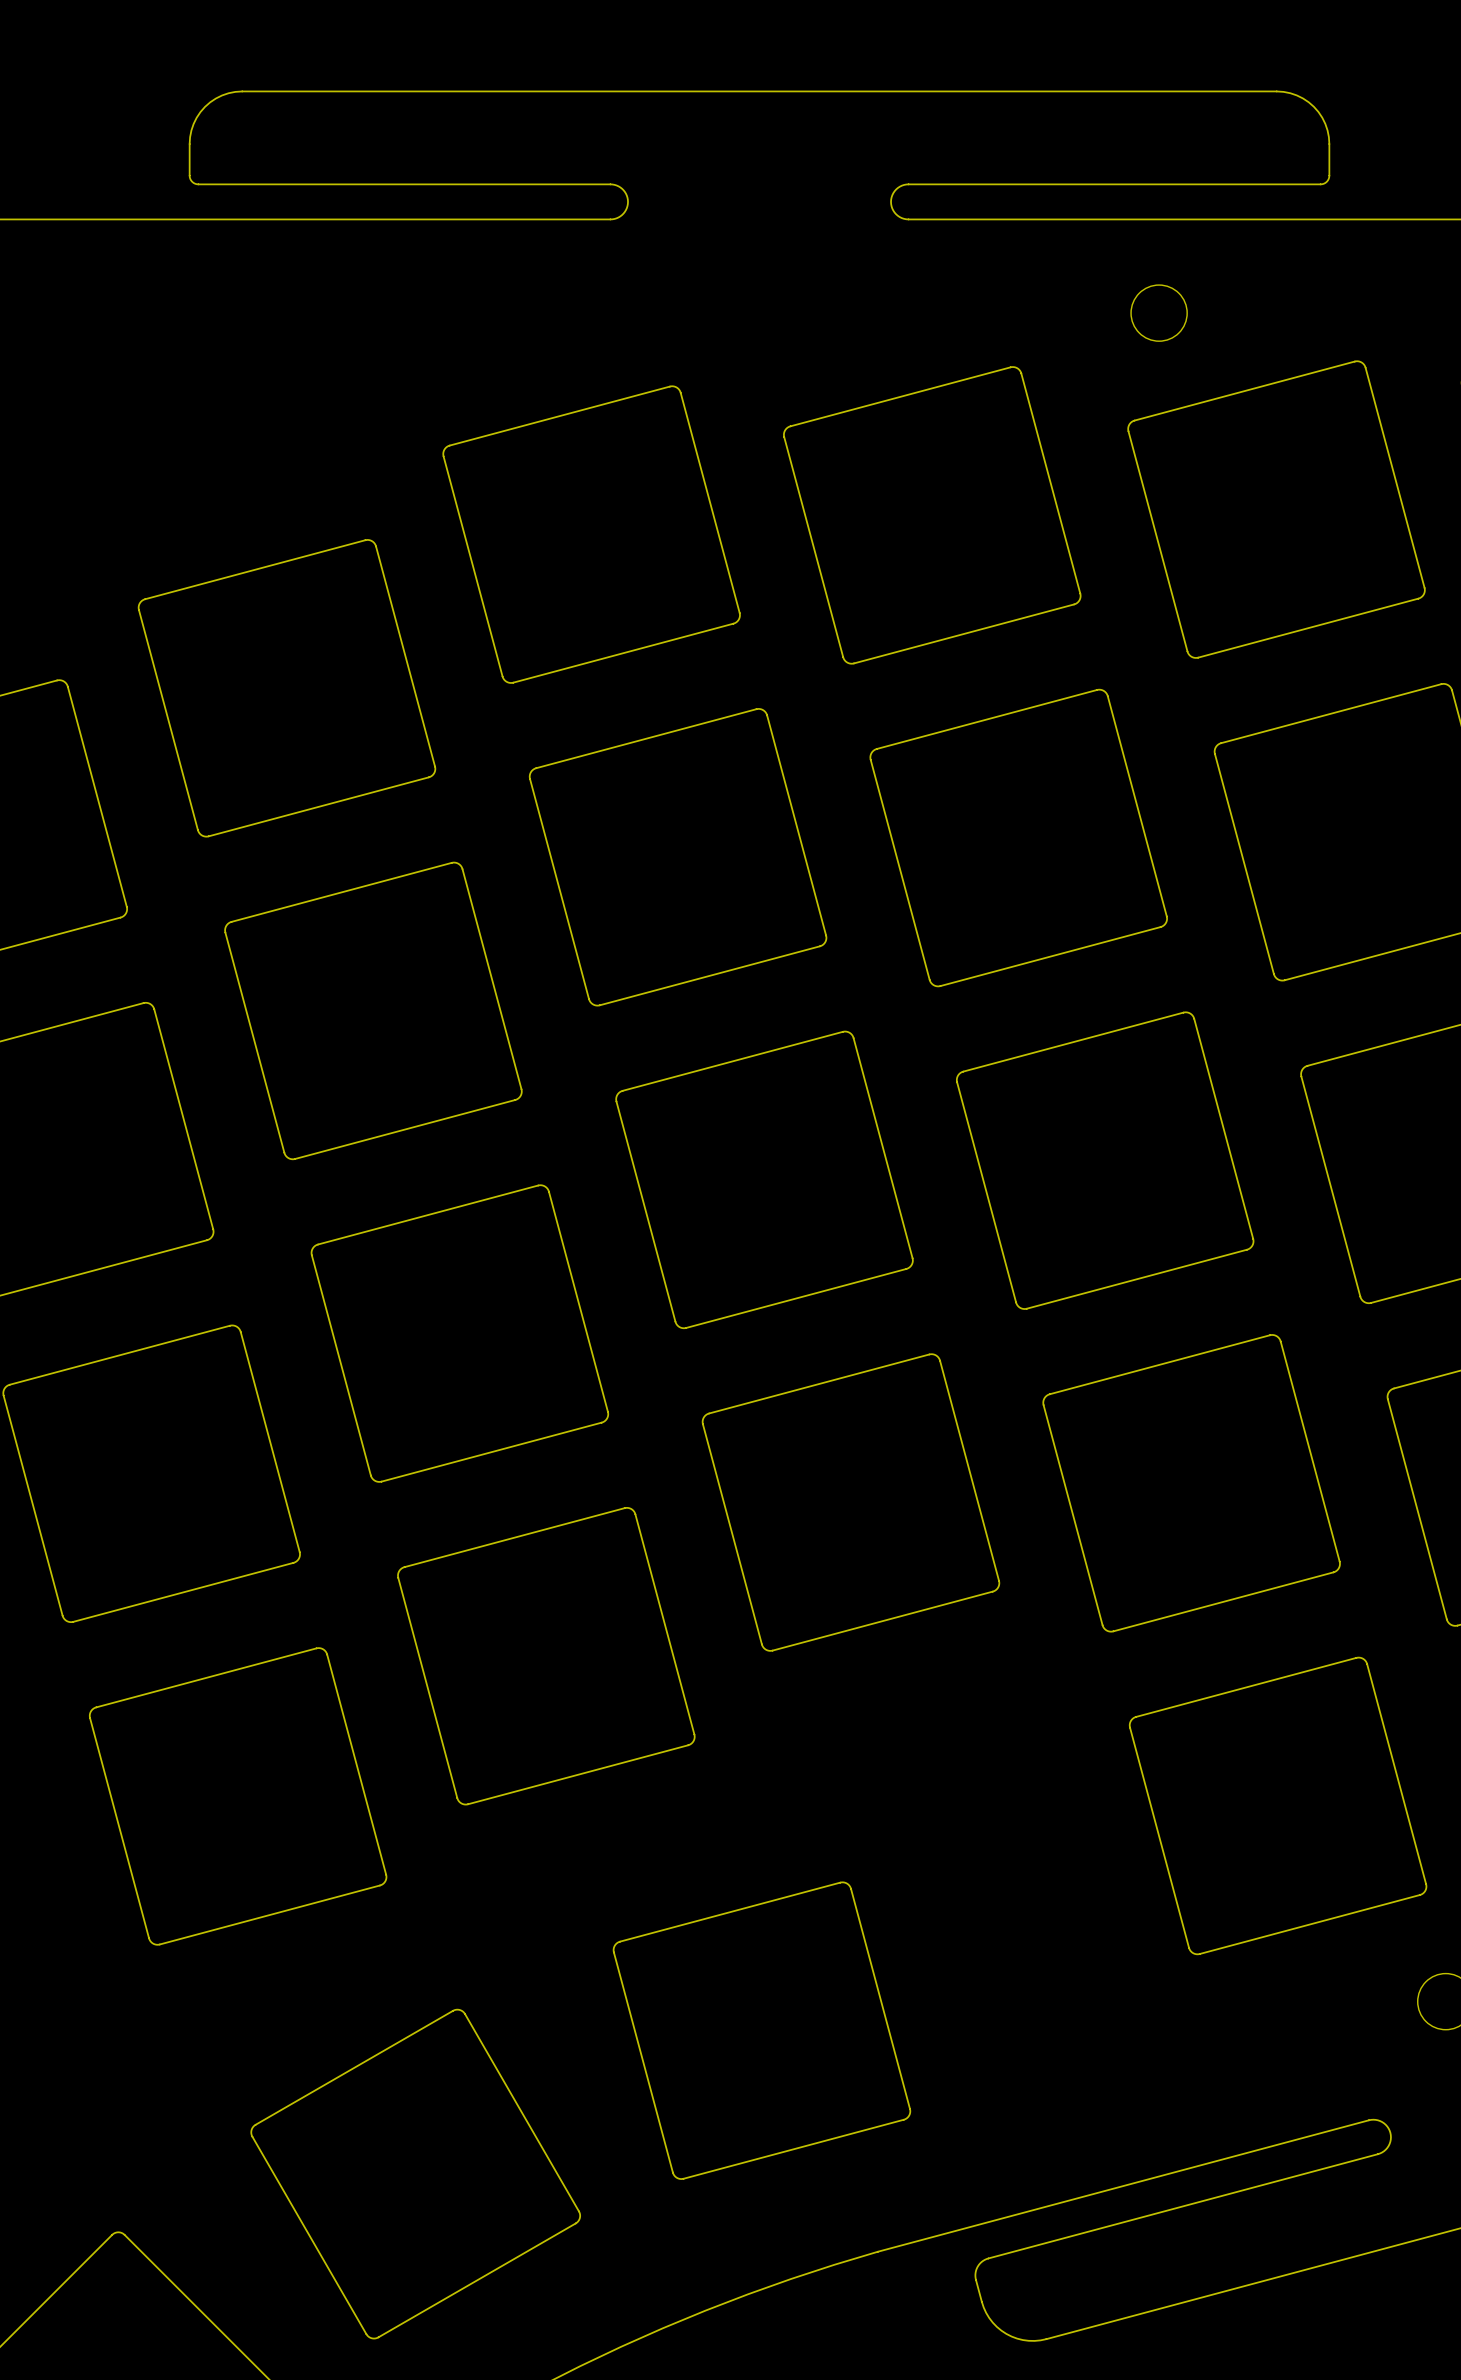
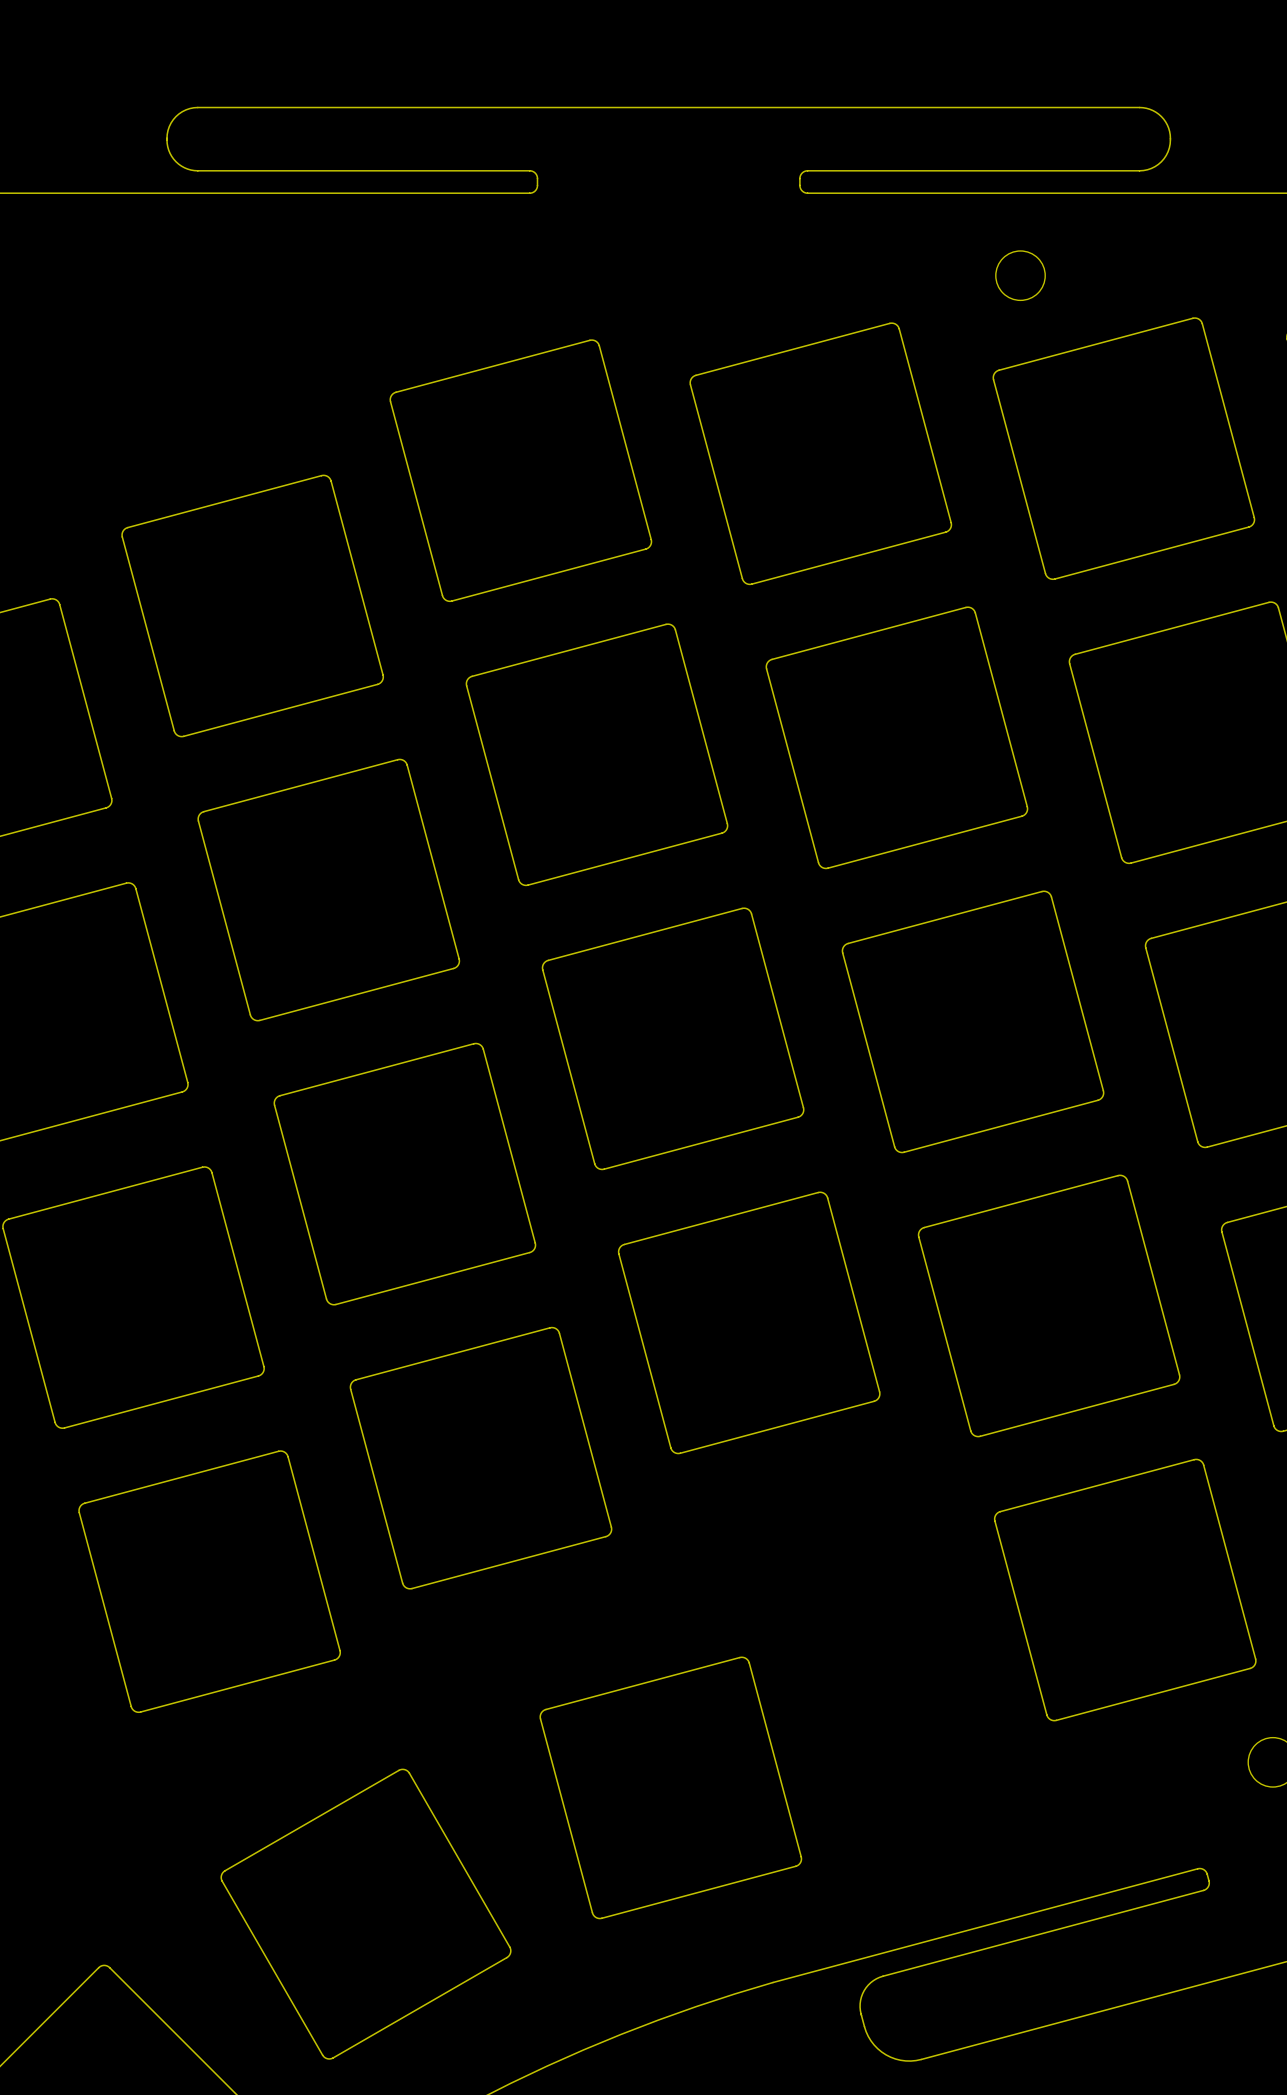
board edge: (189, 157) (191, 130) (200, 112) (210, 102) (222, 95) (242, 91) (1276, 91) (1296, 95) (1308, 102) (1318, 112) (1327, 130) (1329, 157) -> (166, 138) (169, 126) (176, 116) (186, 109) (197, 107) (1139, 107) (1149, 109) (1161, 116) (1167, 125) (1170, 138)
board edge: (189, 158) (190, 178) (197, 184) (610, 184) (618, 186) (626, 195) (627, 204) (625, 210) (616, 218) (601, 219) -> (166, 139) (170, 153) (176, 161) (184, 167) (194, 170) (530, 170) (536, 175) (537, 185) (535, 190) (529, 193)
board edge: (1329, 158) (1328, 178) (1321, 184) (908, 184) (899, 186) (891, 197) (893, 210) (901, 218) (917, 219) -> (1170, 139) (1168, 151) (1161, 161) (1151, 168) (1143, 170) (806, 170) (800, 175) (799, 185) (802, 190) (807, 193)
board edge: (1360, 2122) (1375, 2119) (1385, 2124) (1390, 2137) (1385, 2149) (1377, 2154) (986, 2259) (980, 2263) (976, 2270) (978, 2287) -> (1197, 1868) (1203, 1869) (1207, 1874) (1209, 1883) (1204, 1890) (879, 1977) (870, 1982) (862, 1993) (860, 2003) (861, 2014)

